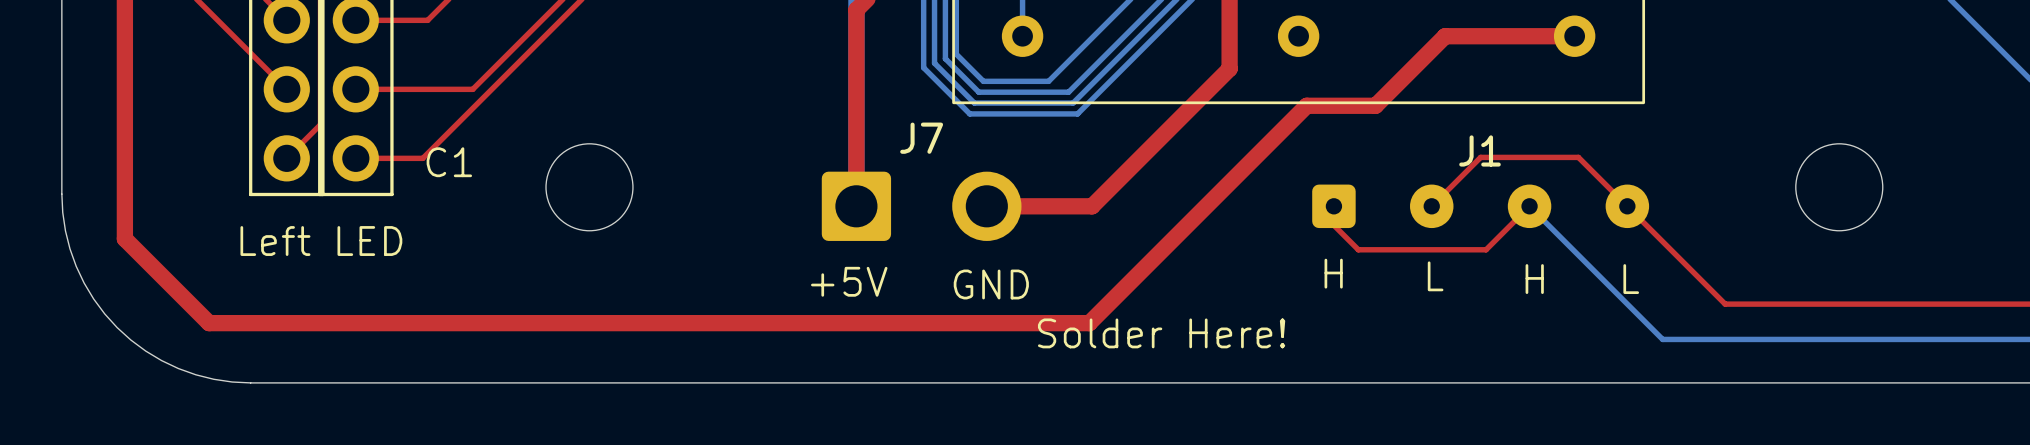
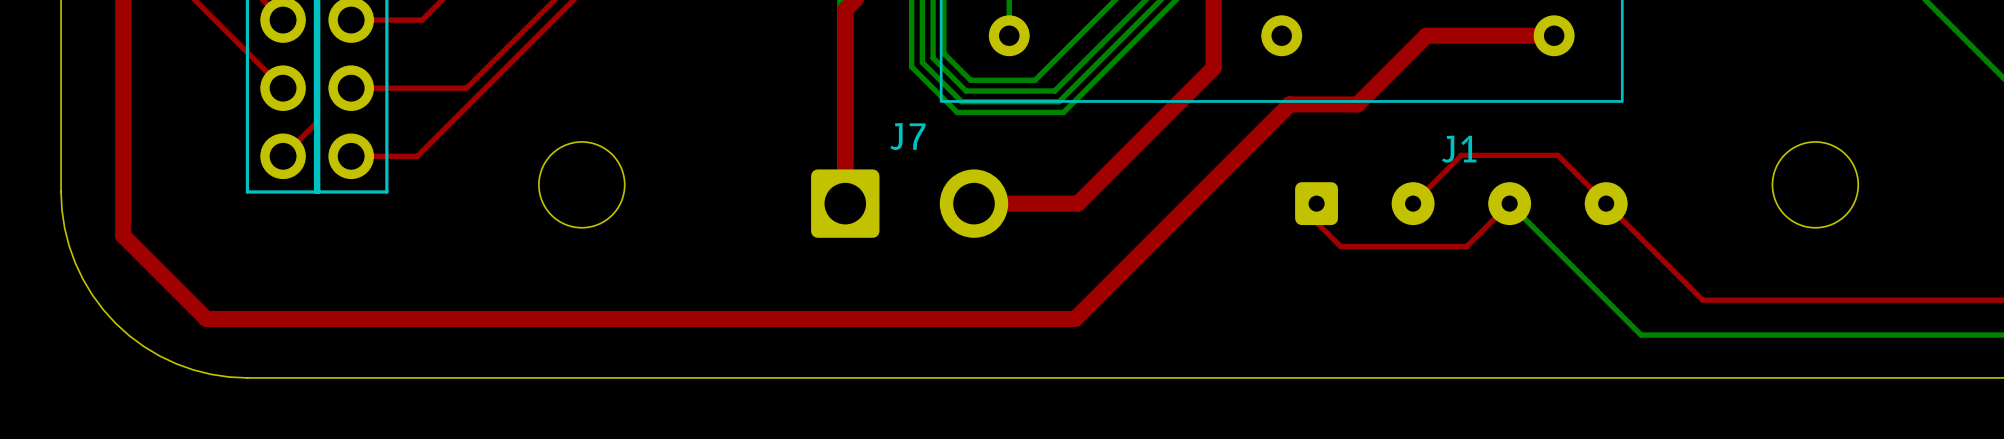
text: C1 (449, 162) -> none
text: Left LED (321, 241) -> none
text: H (1333, 273) -> none
text: L (1435, 276) -> none
text: H (1534, 279) -> none
text: L (1631, 279) -> none
text: +5V (849, 281) -> none
text: GND (991, 284) -> none
text: Solder Here! (1161, 333) -> none

